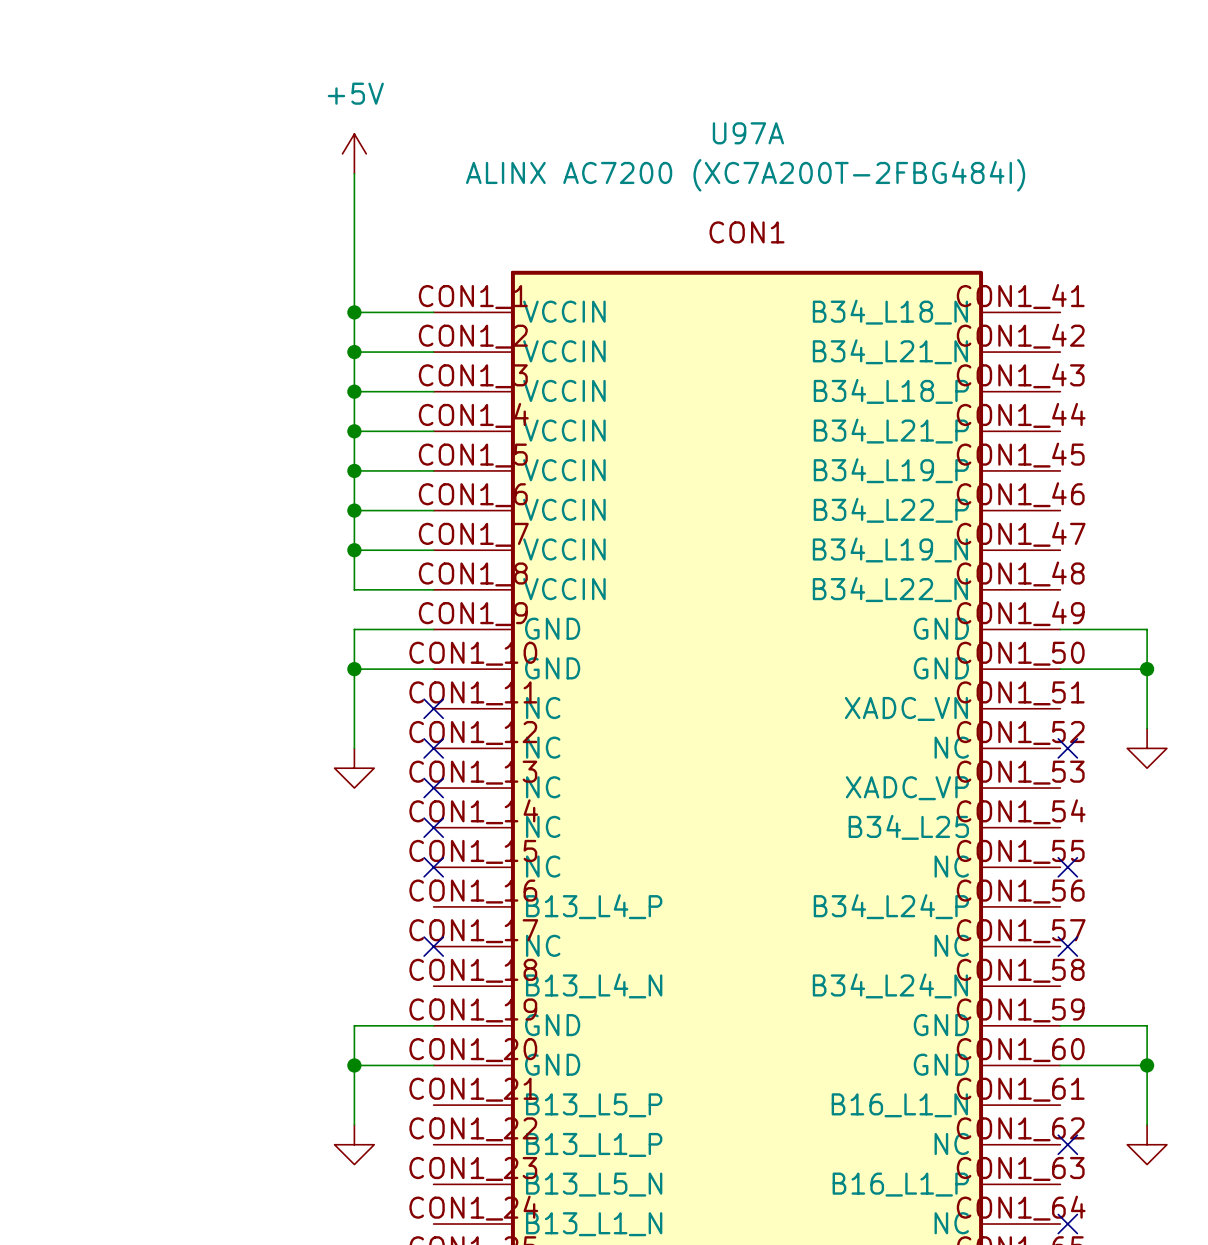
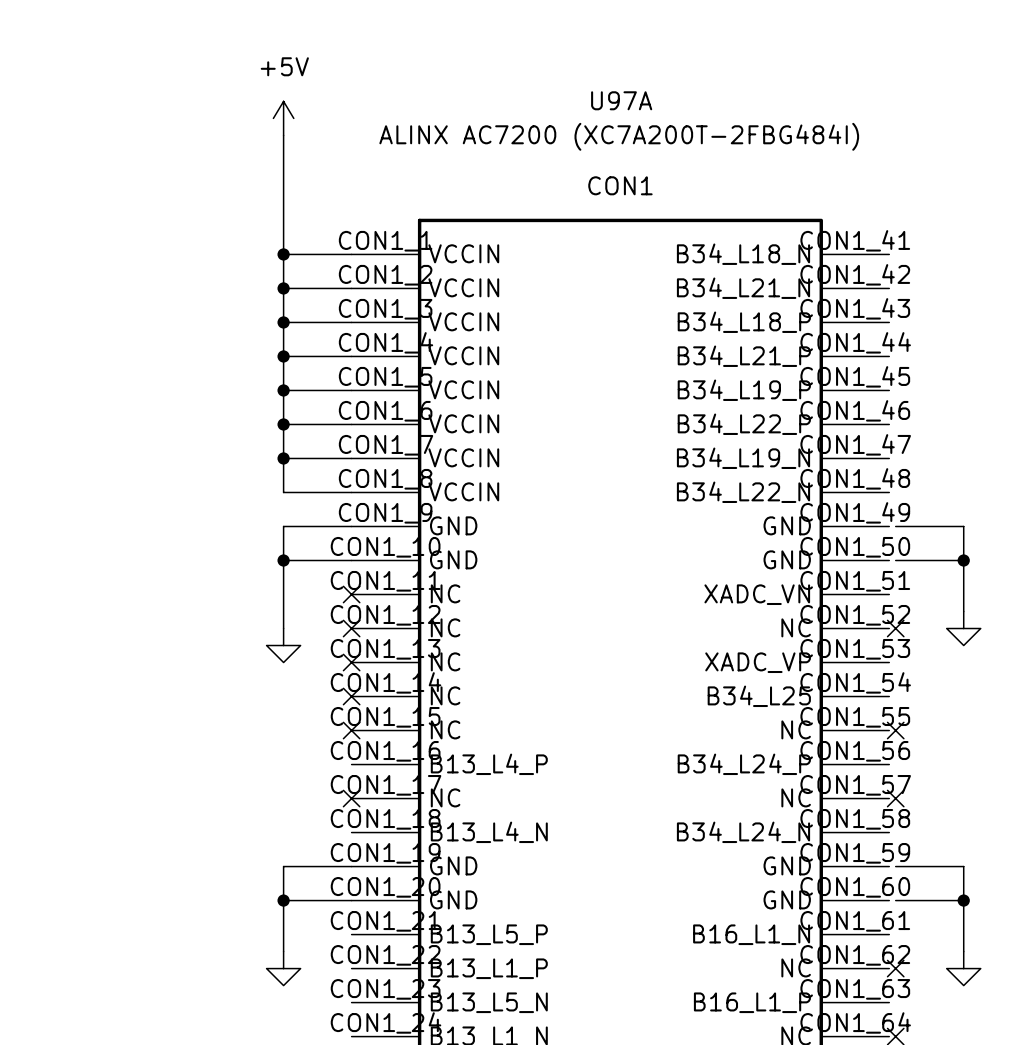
wire: (1060, 629) (1067, 629) -> none
wire: (1060, 669) (1067, 669) -> none
wire: (1060, 1025) (1067, 1025) -> none
wire: (1060, 1065) (1067, 1065) -> none

